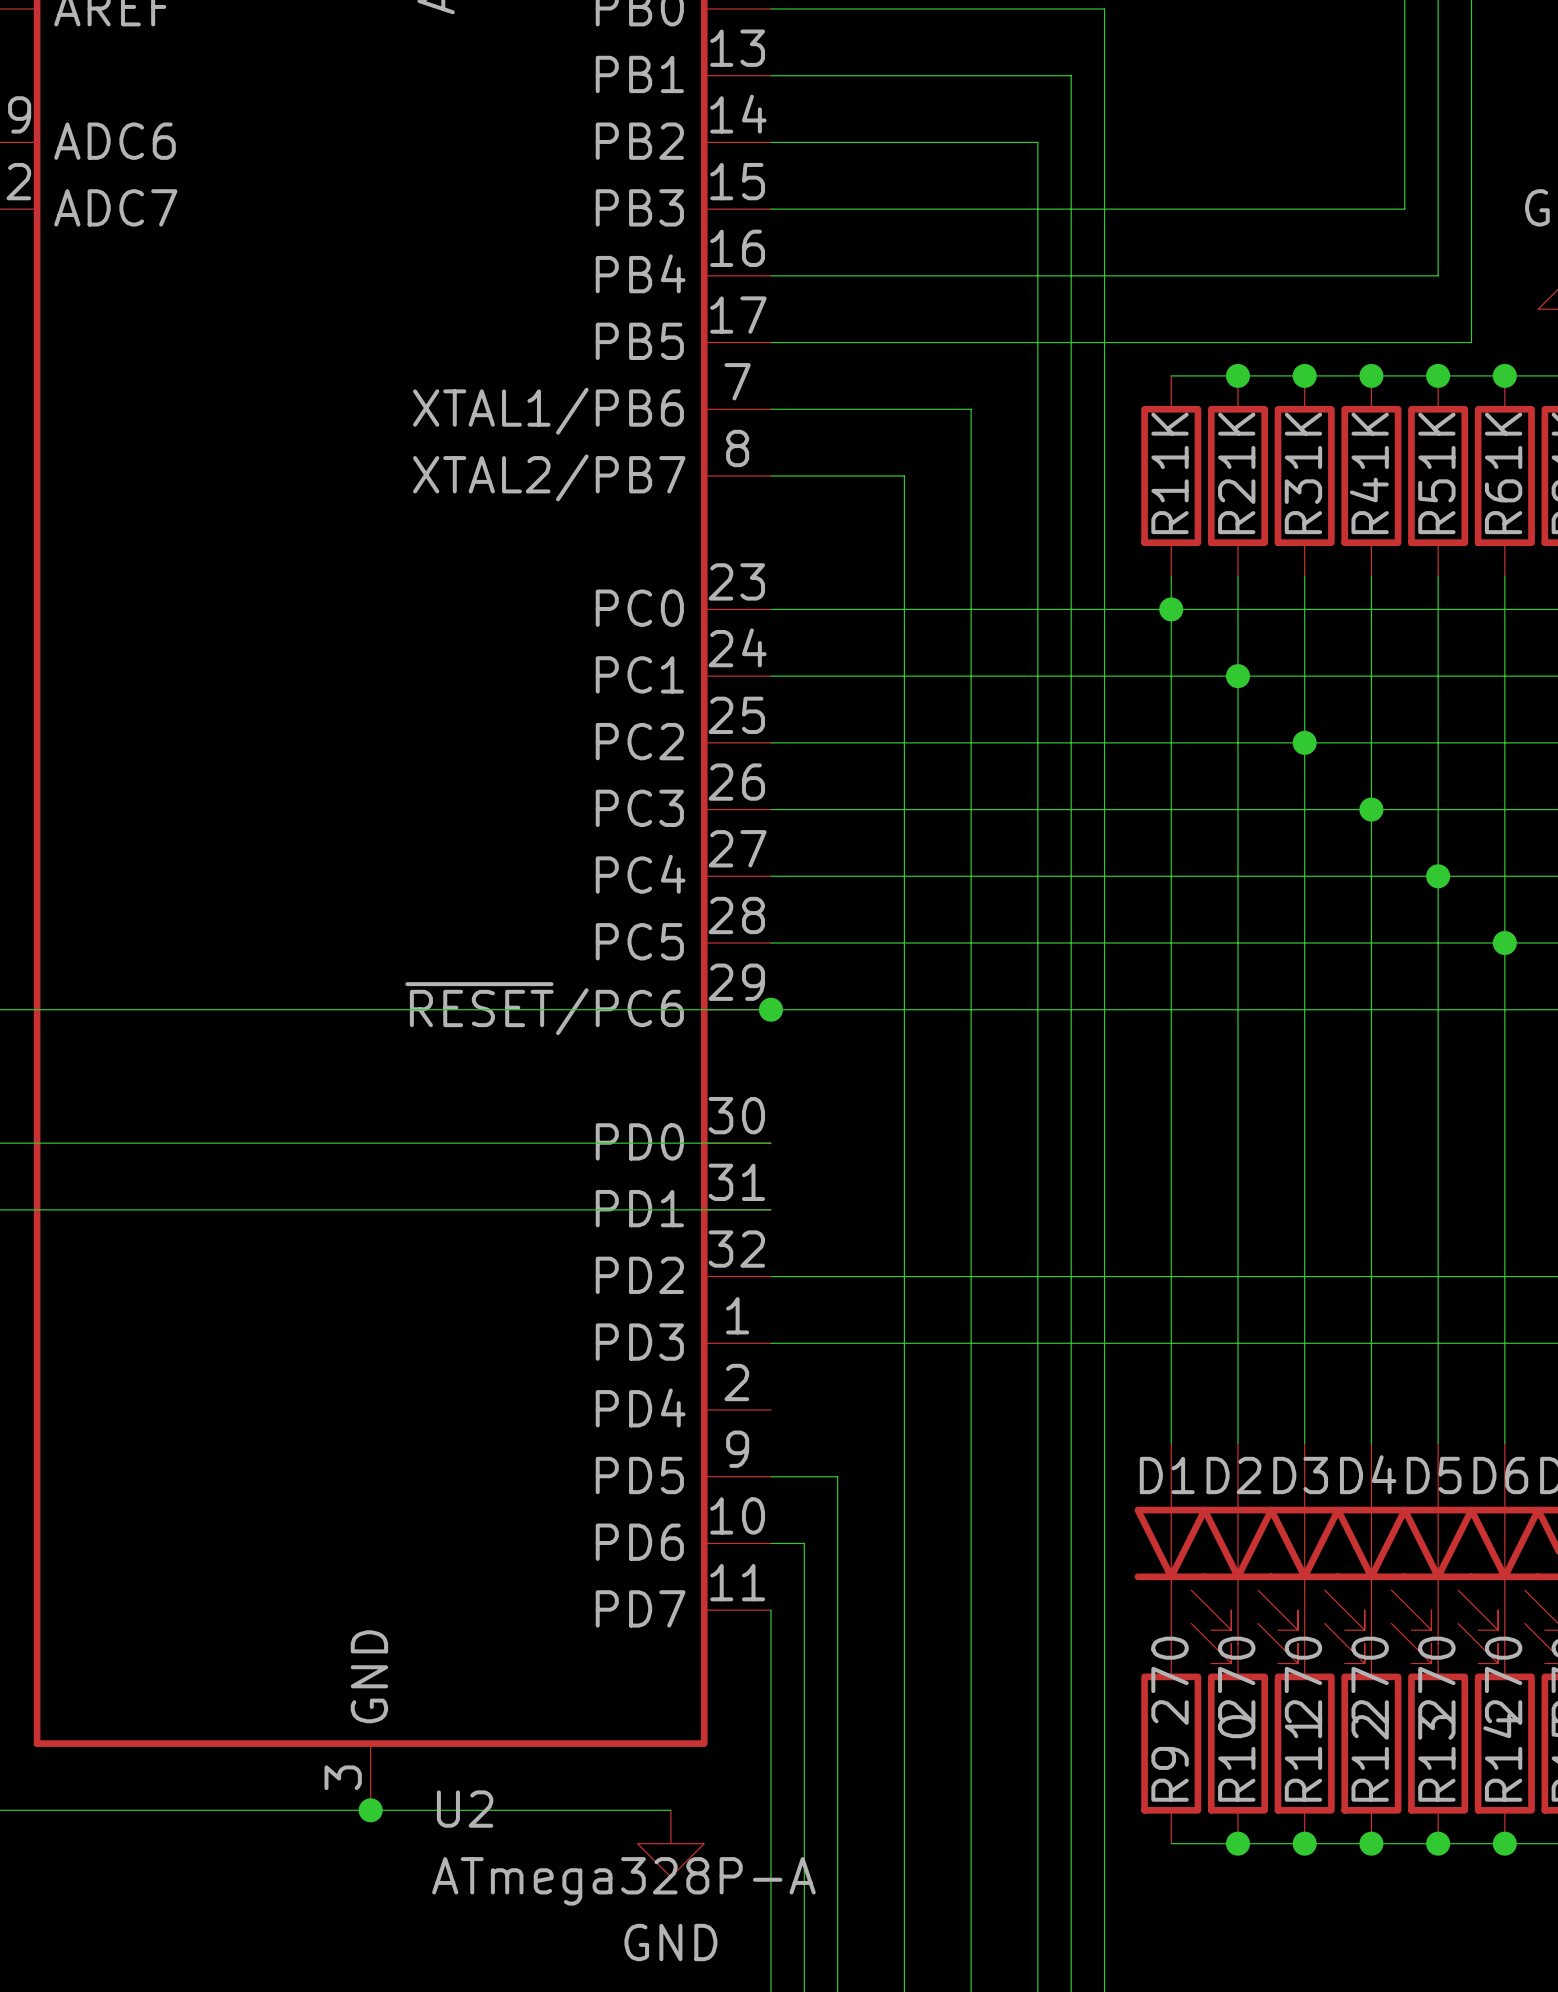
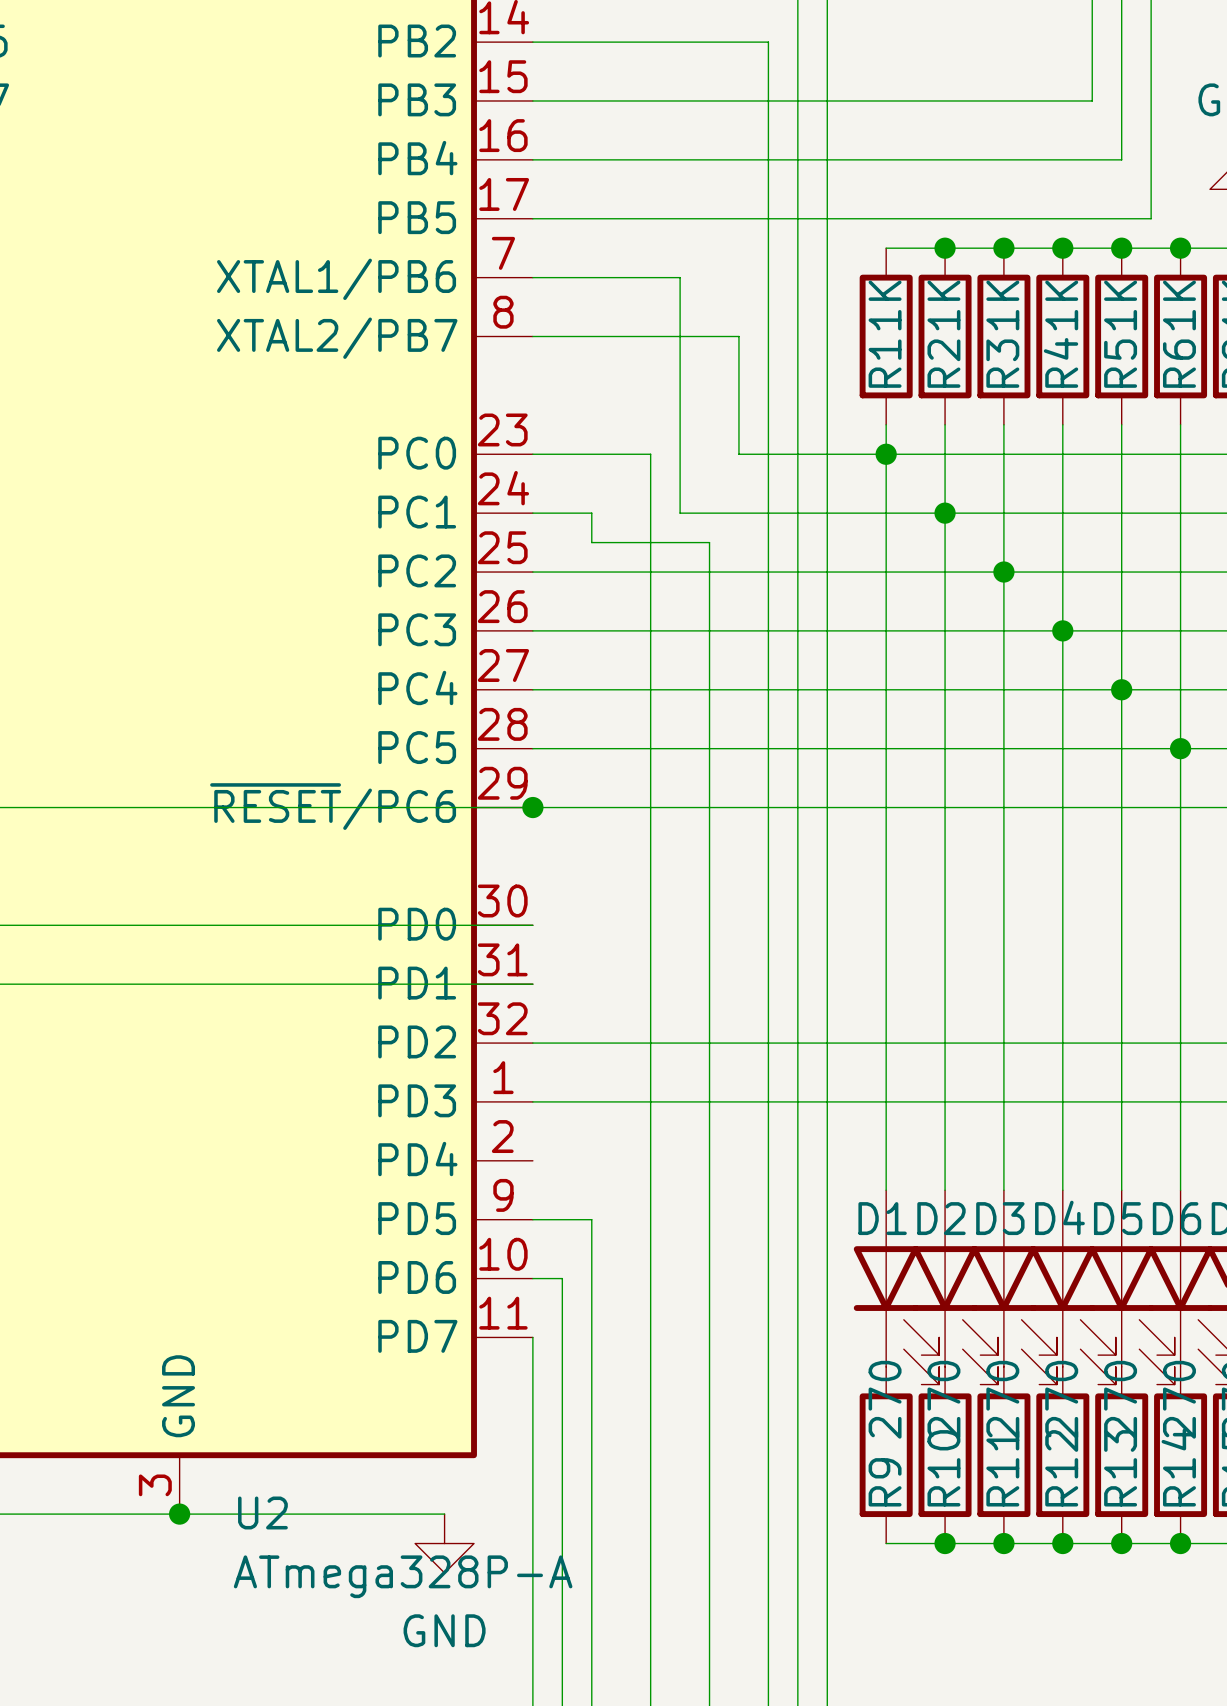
wire: (937, 409) (971, 409) (971, 709) -> (680, 277) (680, 513)
wire: (904, 475) (904, 609) (1004, 609) -> (650, 336) (738, 336) (738, 454)
wire: (837, 676) (937, 676) -> (591, 513) (591, 542) (709, 542)

